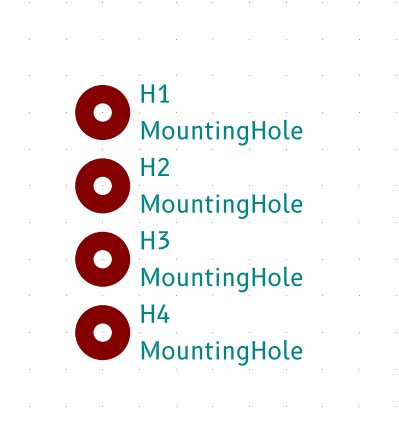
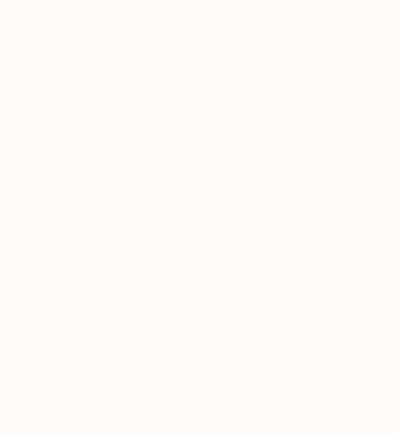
H1: MountingHole (102, 112) -> none
H2: MountingHole (102, 185) -> none
H3: MountingHole (102, 259) -> none
H4: MountingHole (102, 332) -> none

